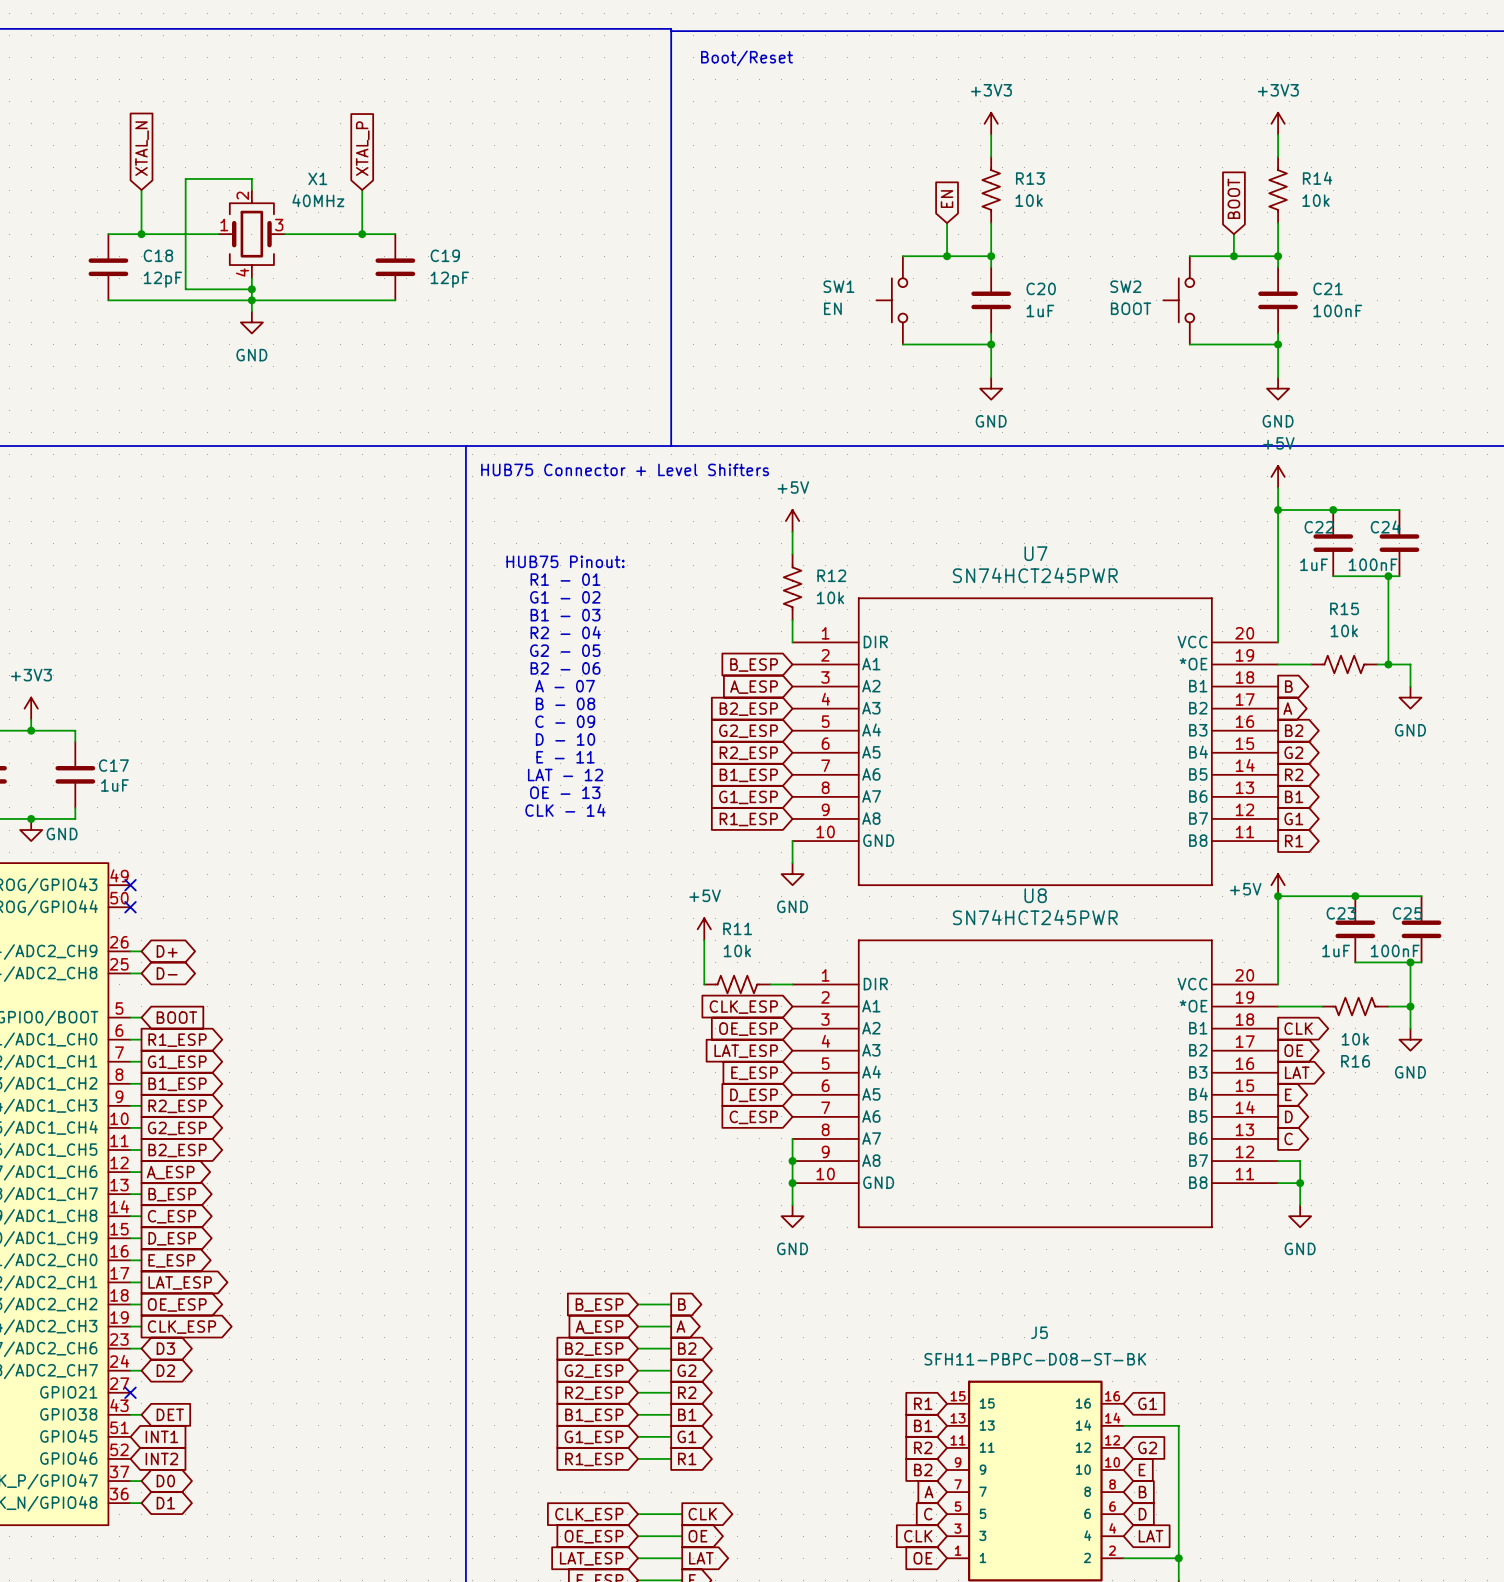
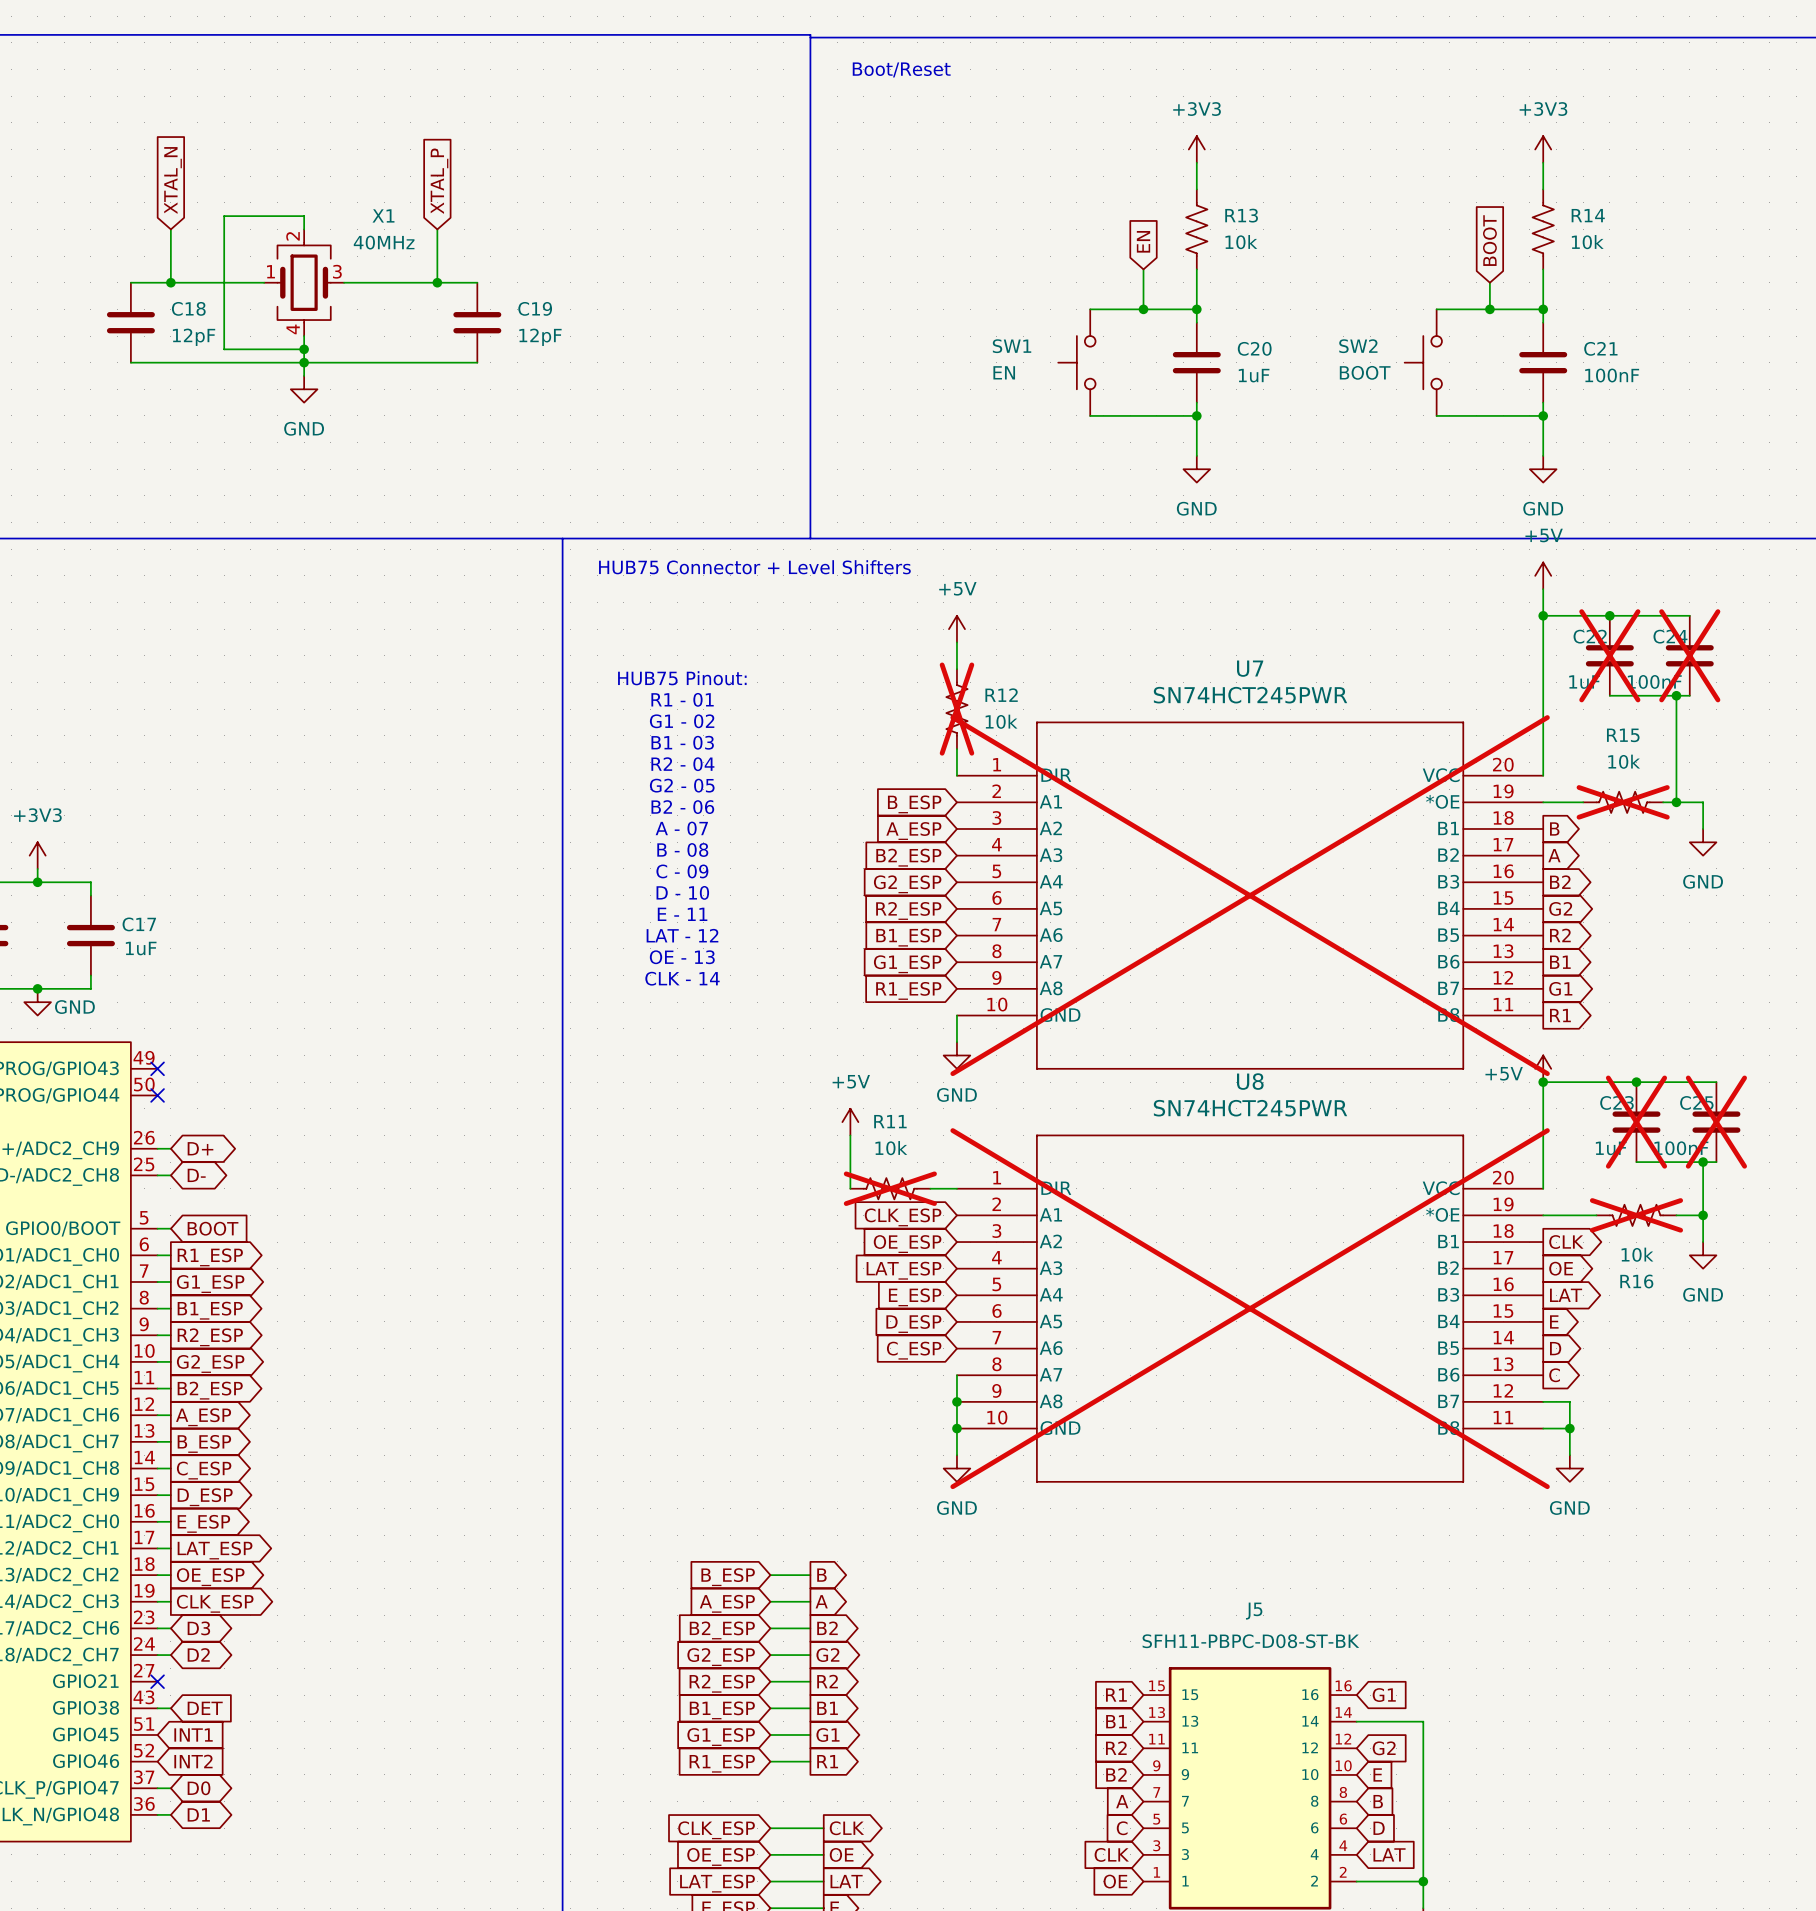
C22 do-not-place cross: none -> (1609, 655)
C24 do-not-place cross: none -> (1689, 655)
R12 do-not-place cross: none -> (956, 709)
R15 do-not-place cross: none -> (1623, 802)
U7 do-not-place cross: none -> (1250, 895)
C23 do-not-place cross: none -> (1636, 1122)
C25 do-not-place cross: none -> (1716, 1122)
R11 do-not-place cross: none -> (890, 1188)
R16 do-not-place cross: none -> (1636, 1215)
U8 do-not-place cross: none -> (1250, 1308)

